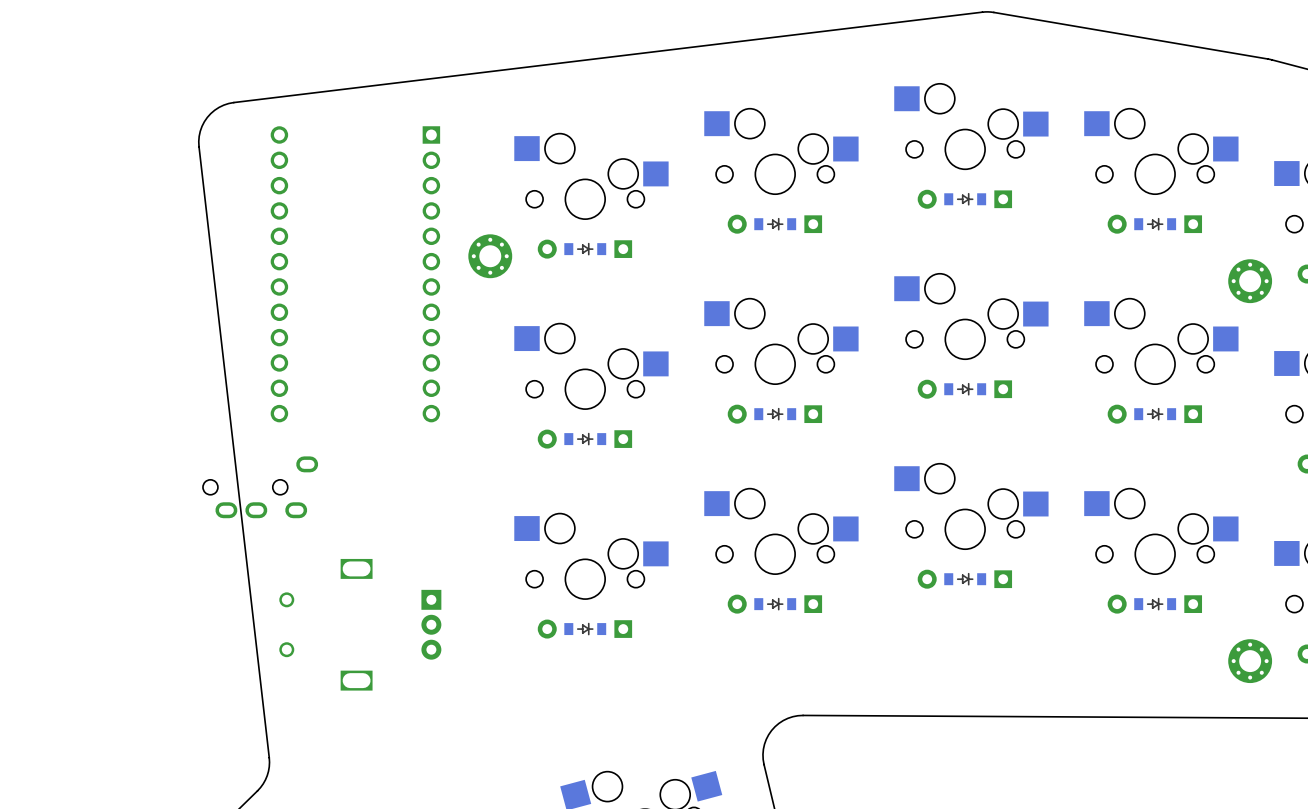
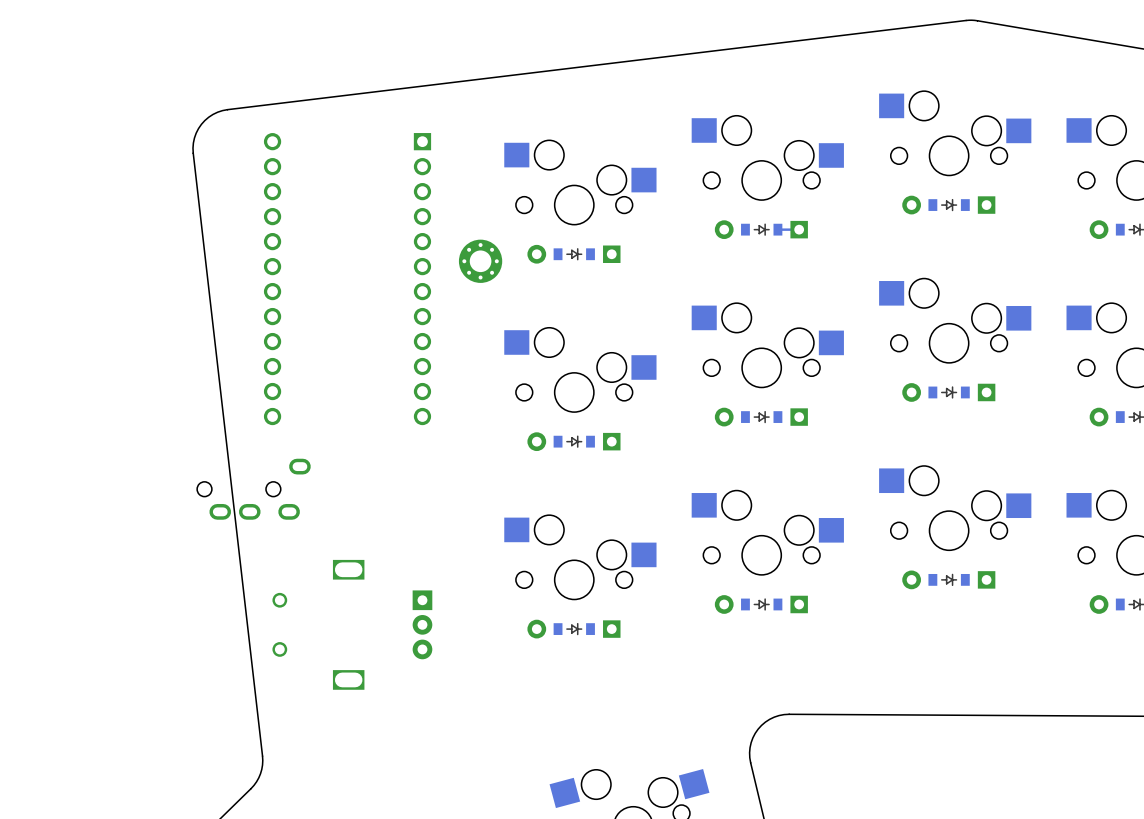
track: none -> (799, 229) (777, 229)

